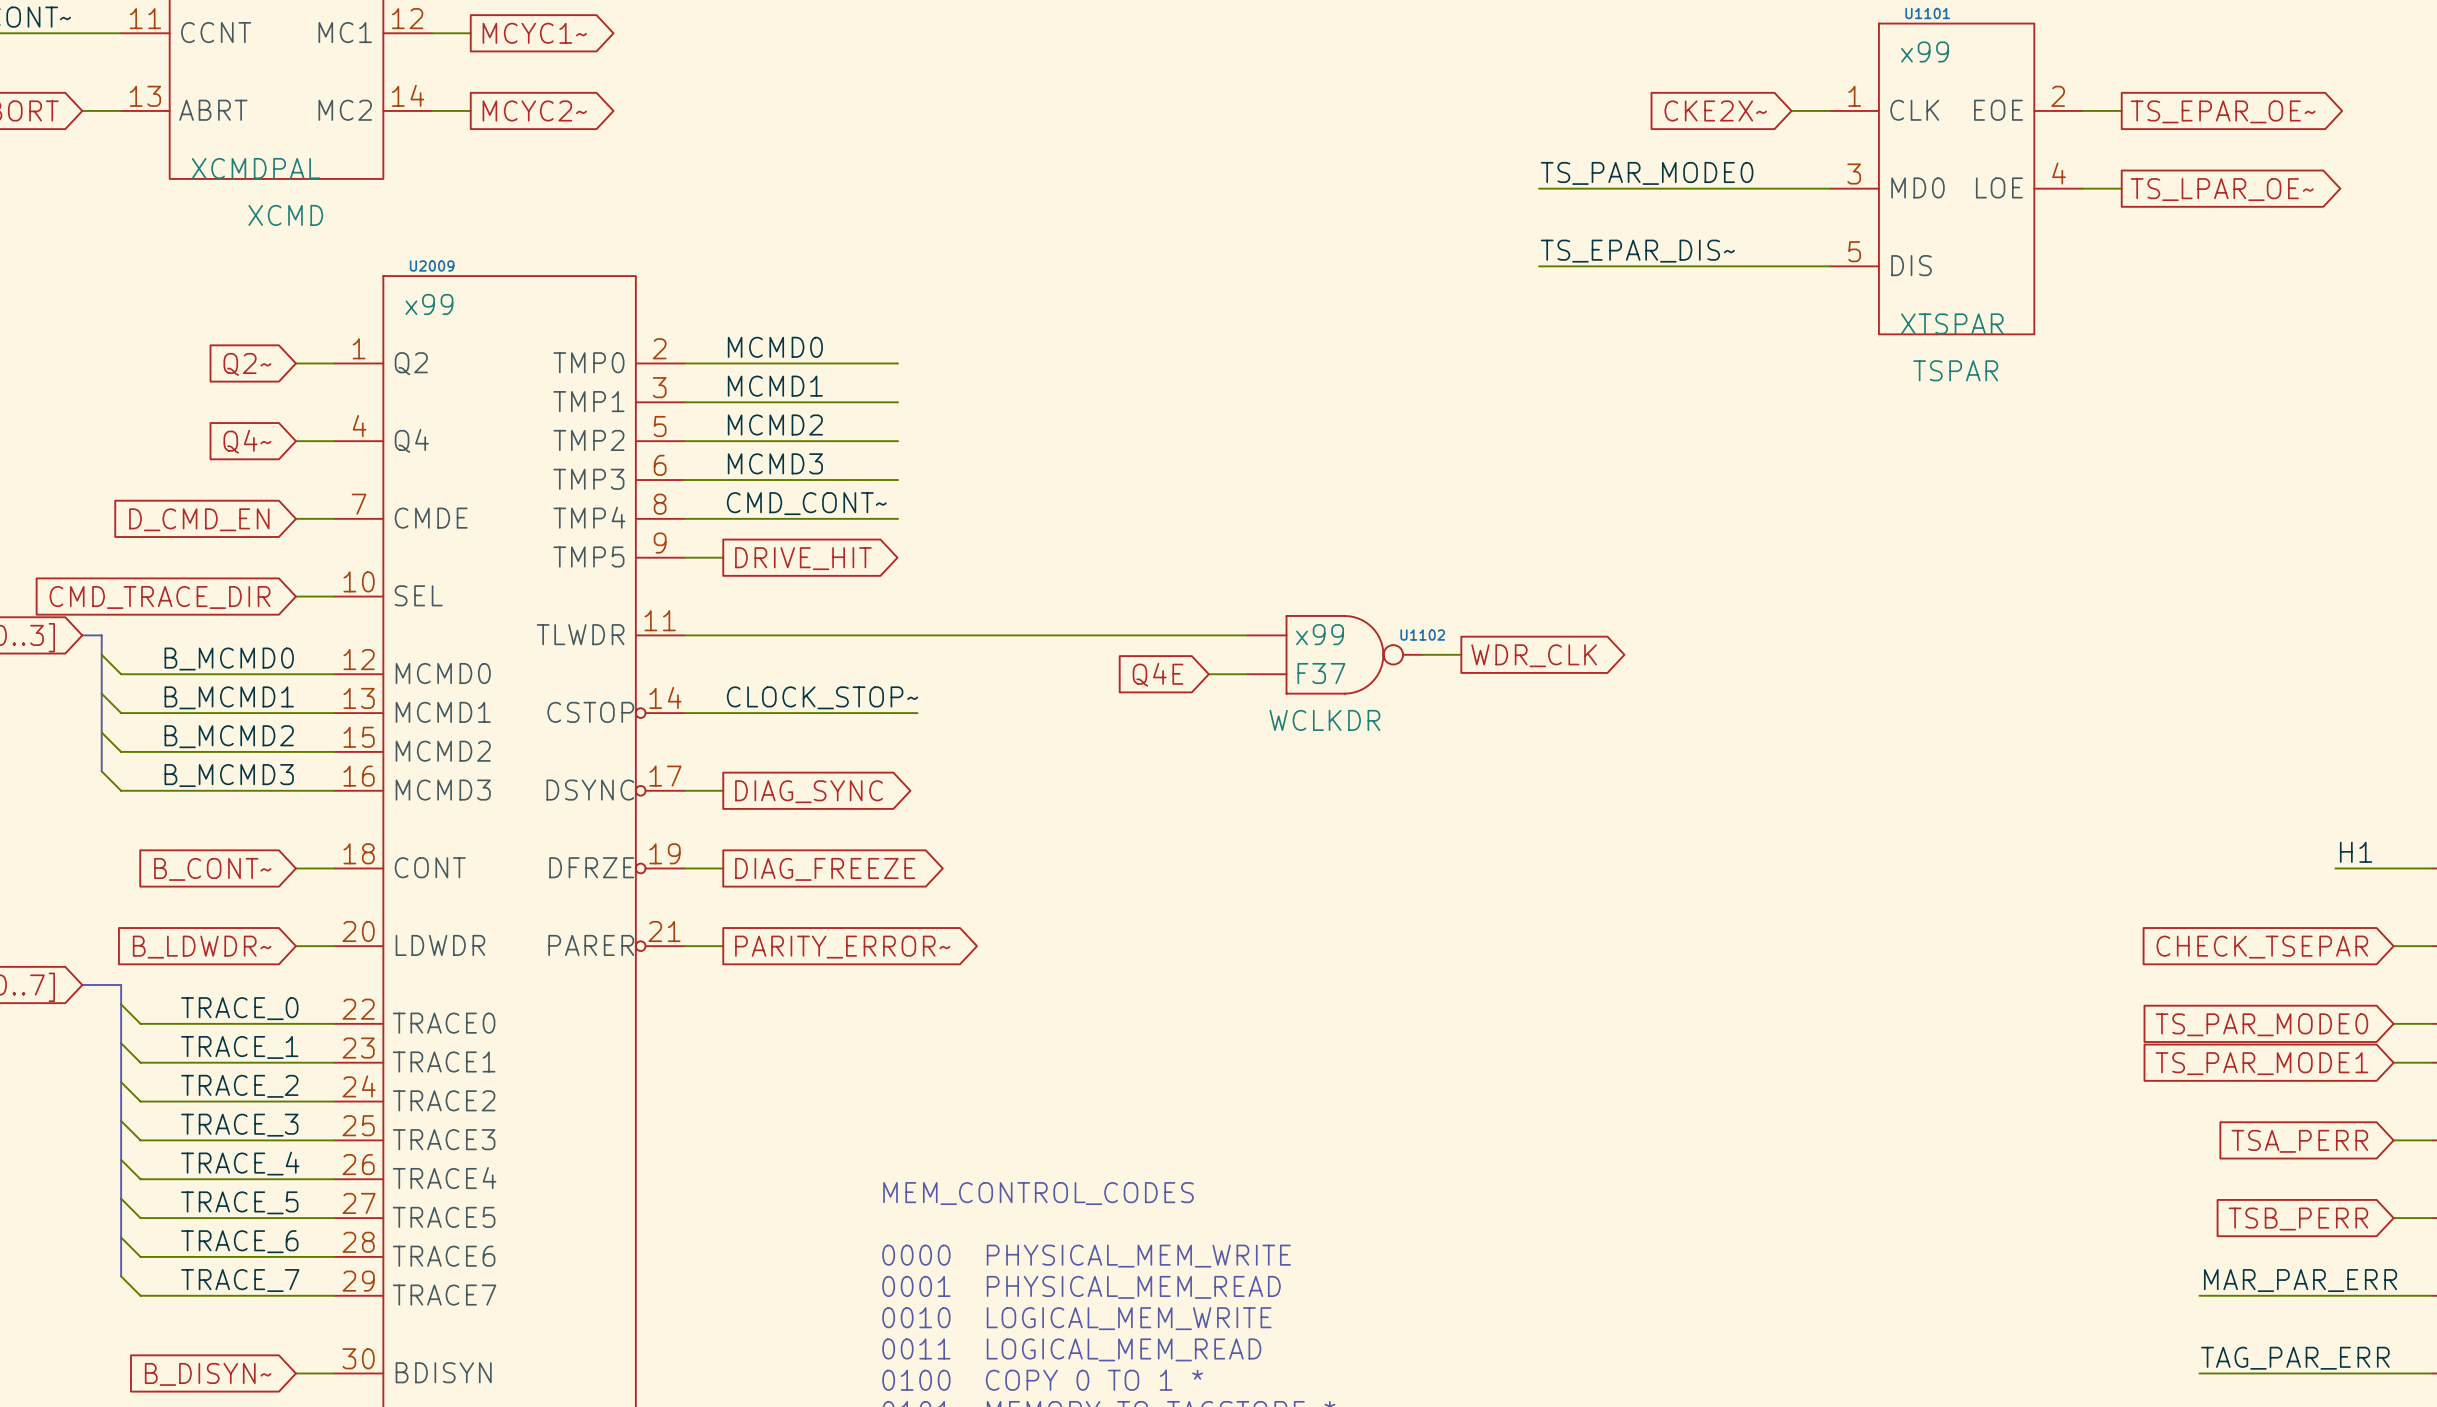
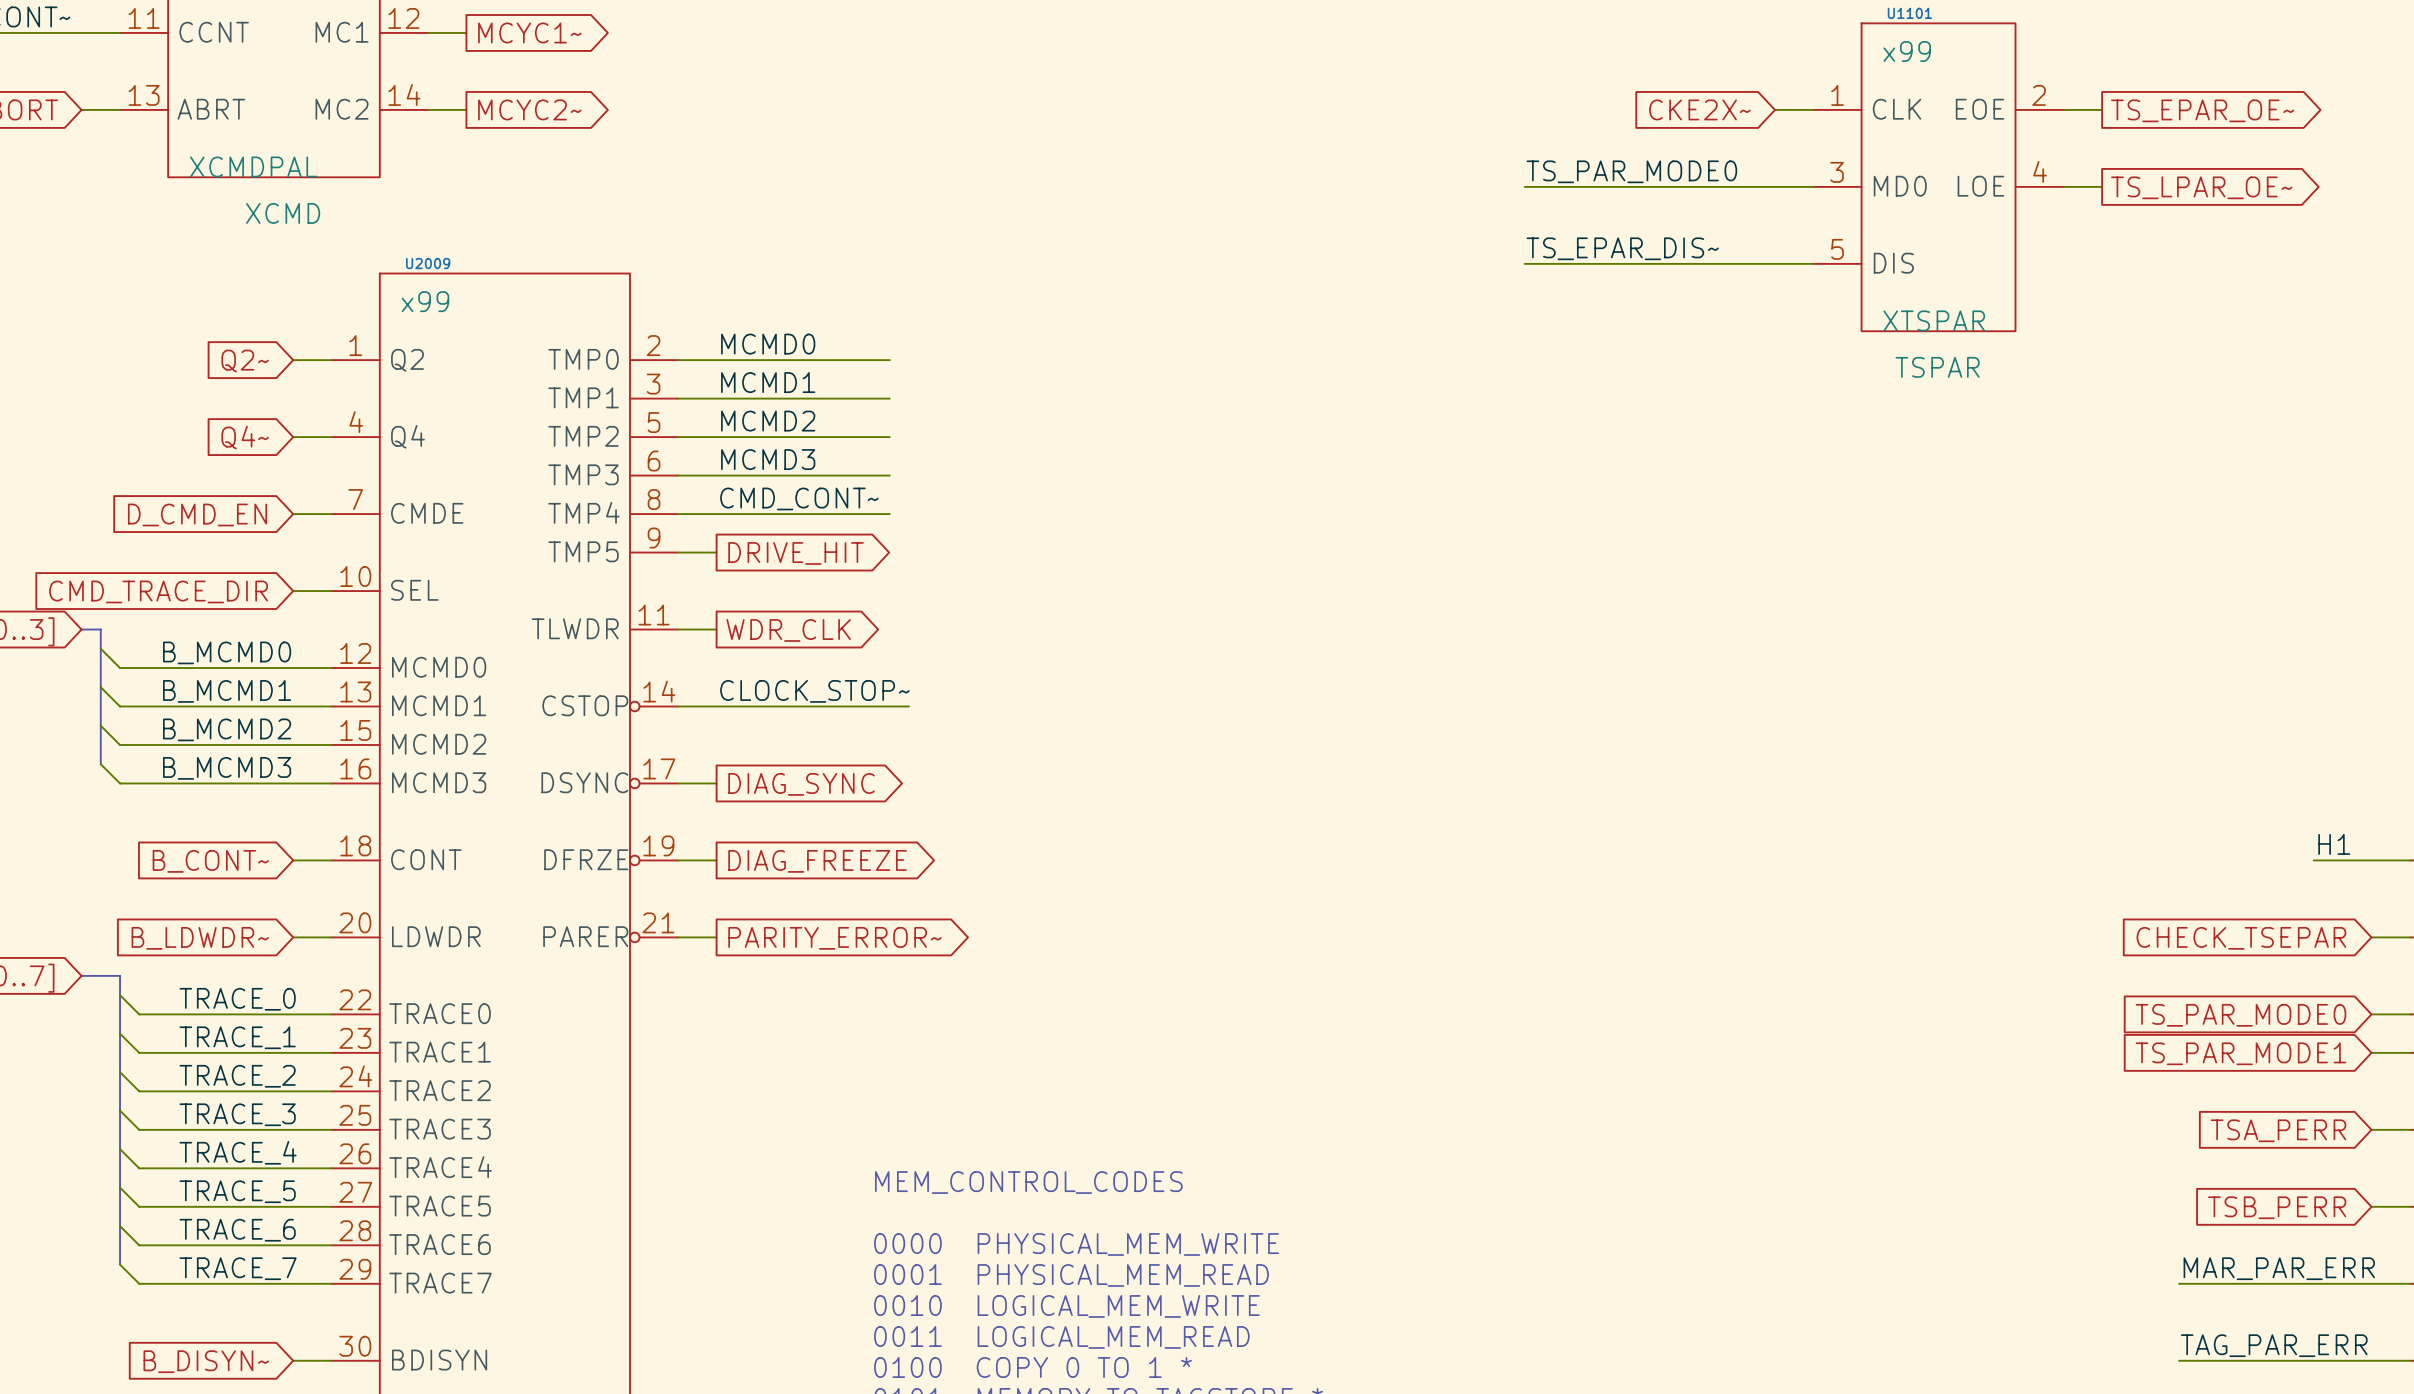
wire: (723, 635) (1247, 635) -> none
global label: none -> WDR_CLK (788, 630)
U1102: F37 (1335, 654) -> none
wire: (1422, 654) (1461, 654) -> none
global label: WDR_CLK (1534, 655) -> none
global label: Q4E (1158, 674) -> none
wire: (1208, 674) (1247, 674) -> none

